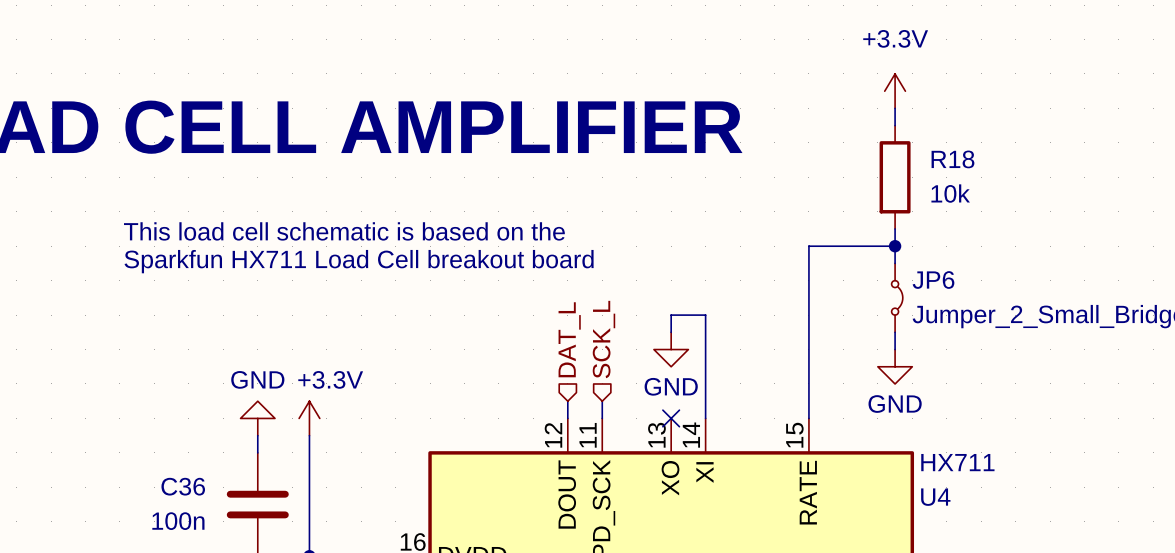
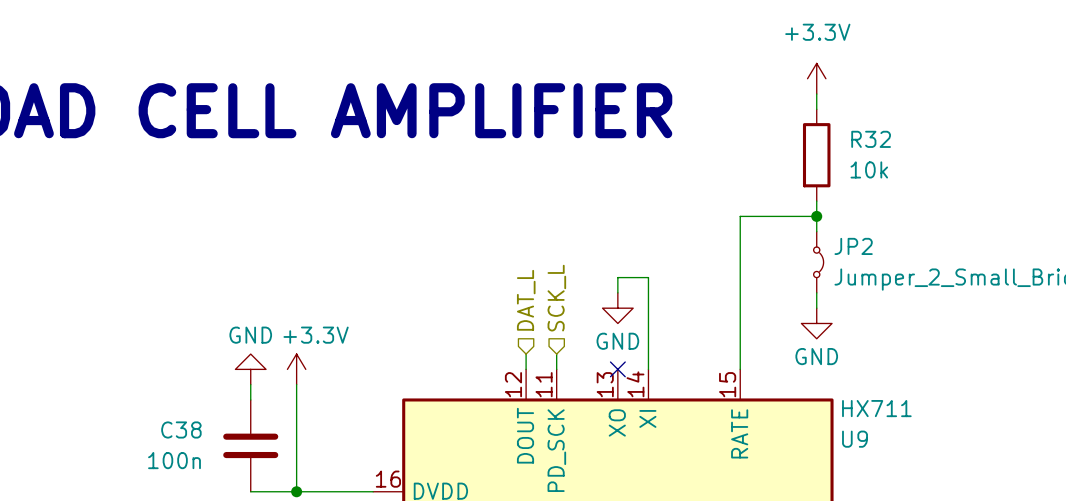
R18 name: R18 (952, 159) -> R32 (871, 139)
text: This load cell schematic is based on the (344, 231) -> none
text: Sparkfun HX711 Load Cell breakout board (359, 261) -> none
JP6 name: JP6 (933, 280) -> JP2 (853, 246)
C36 name: C36 (183, 486) -> C38 (181, 429)
U4 name: U4 (935, 497) -> U9 (855, 439)

